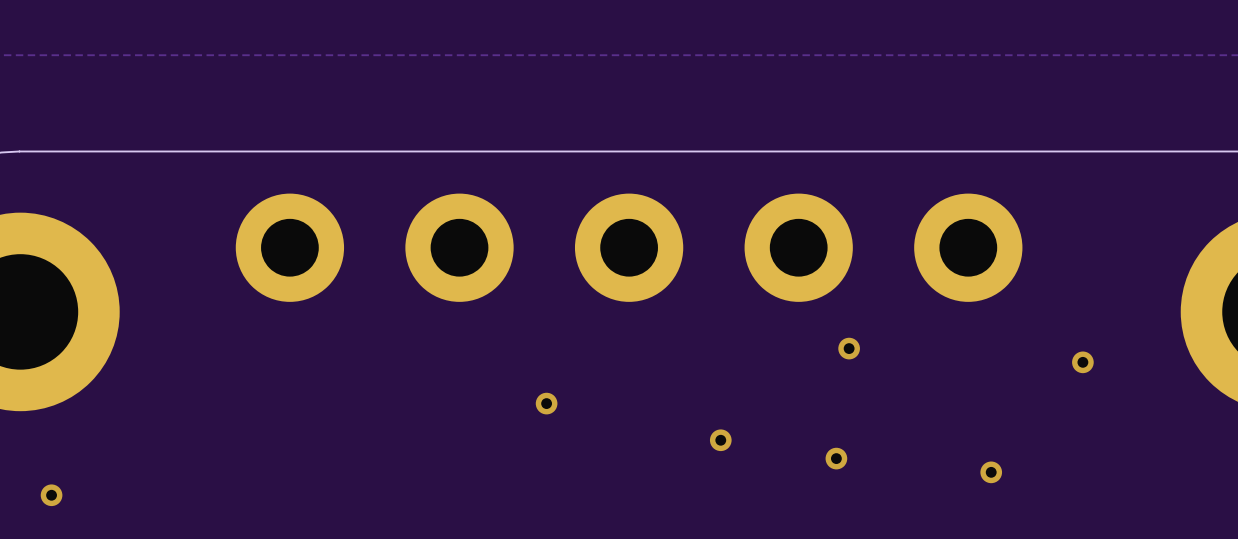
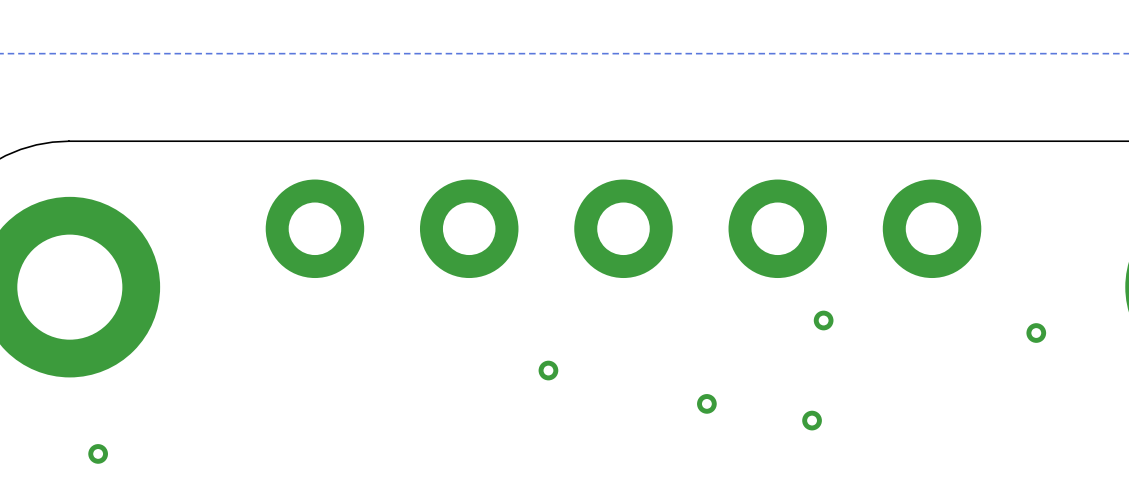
via: (991, 472) -> none

